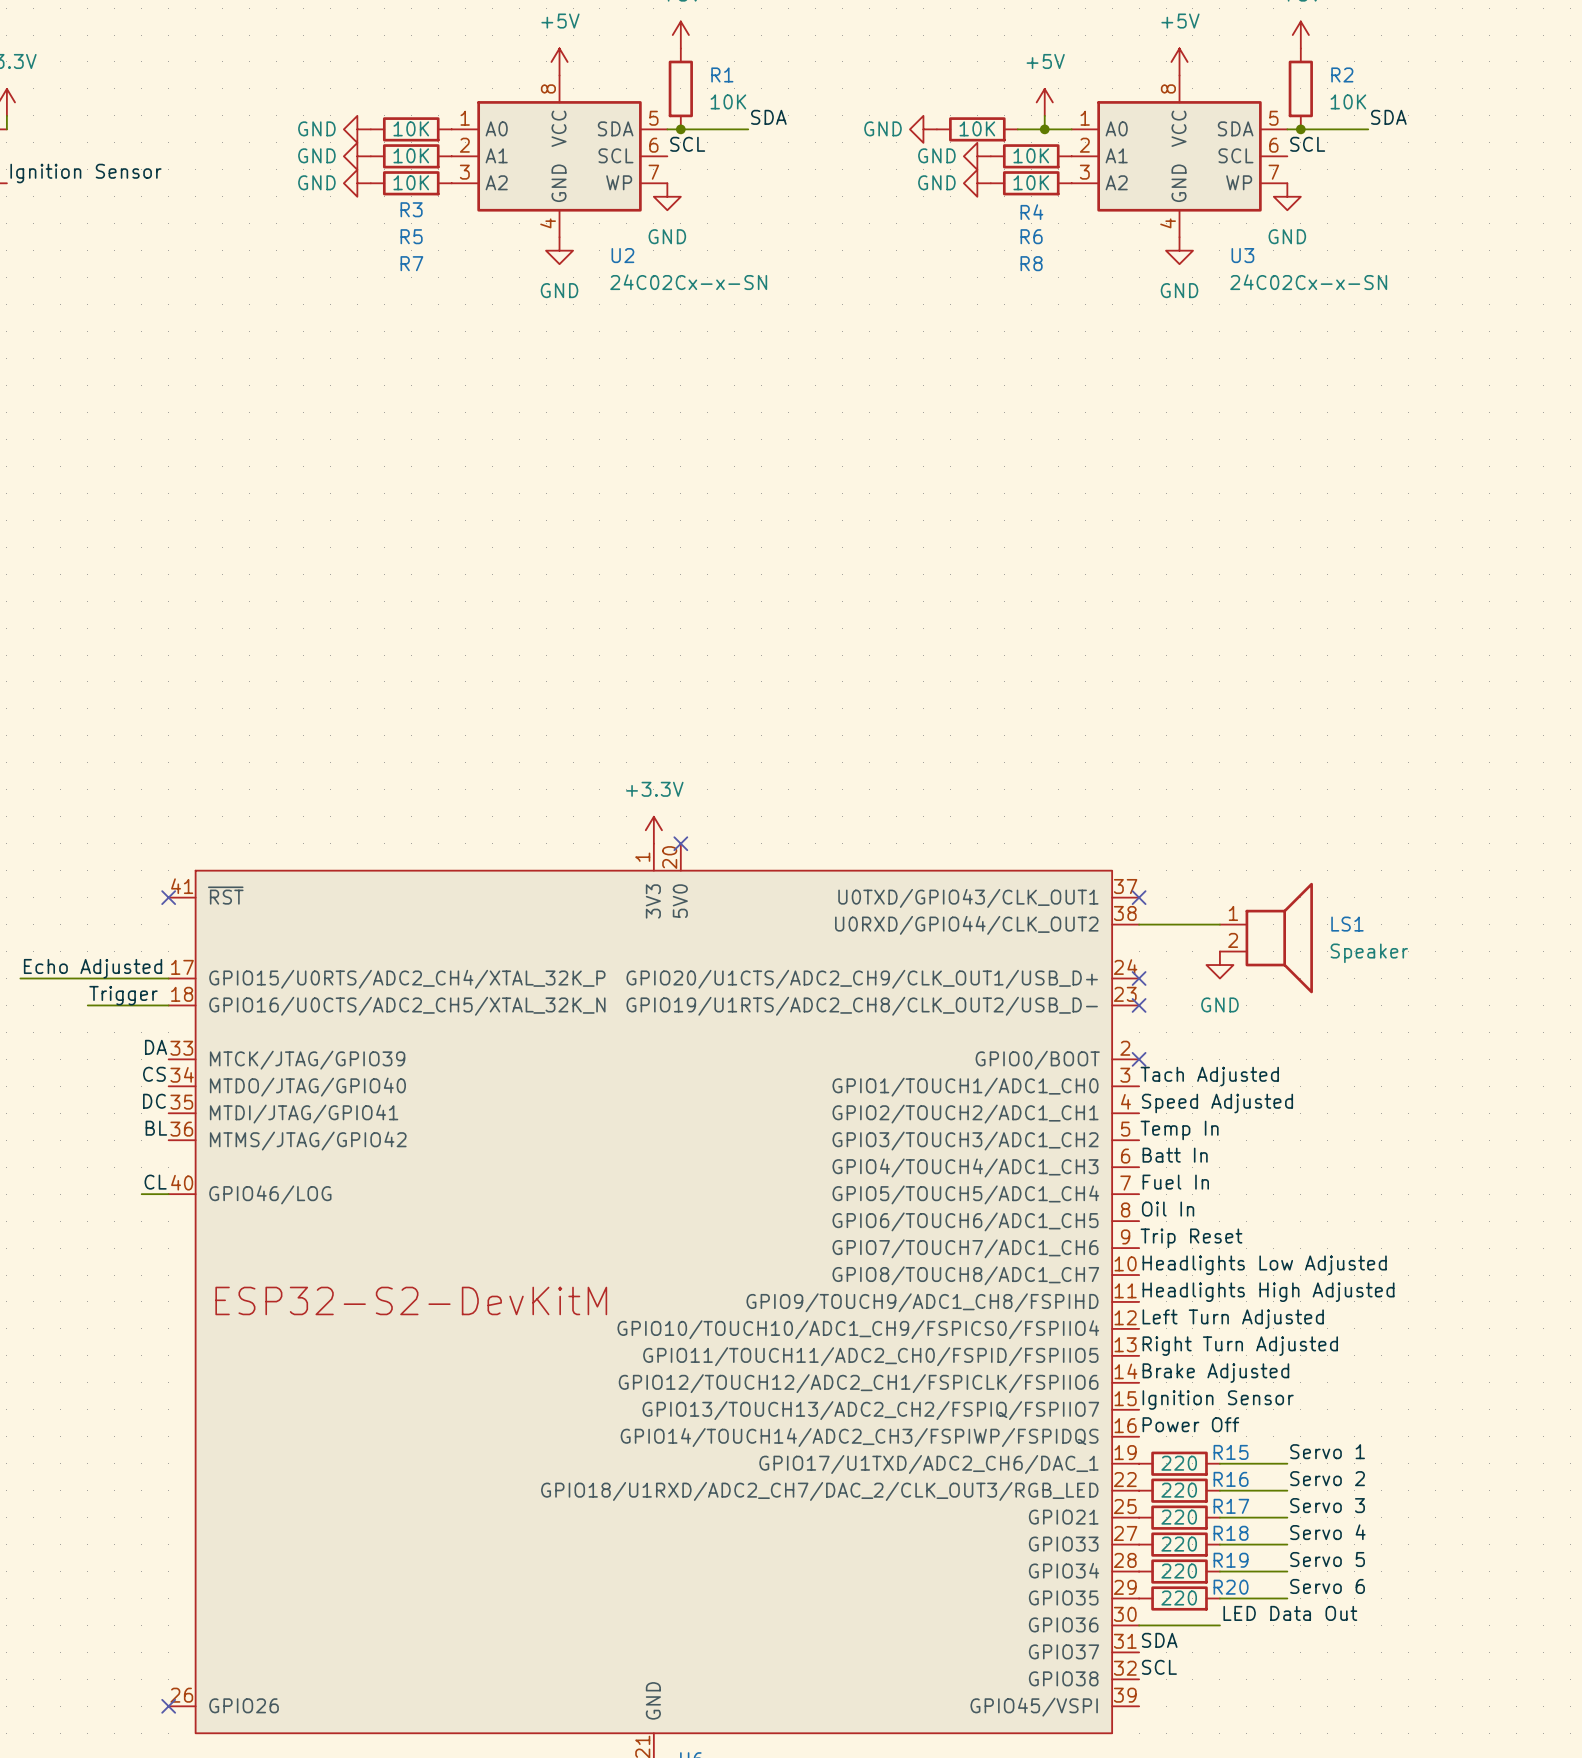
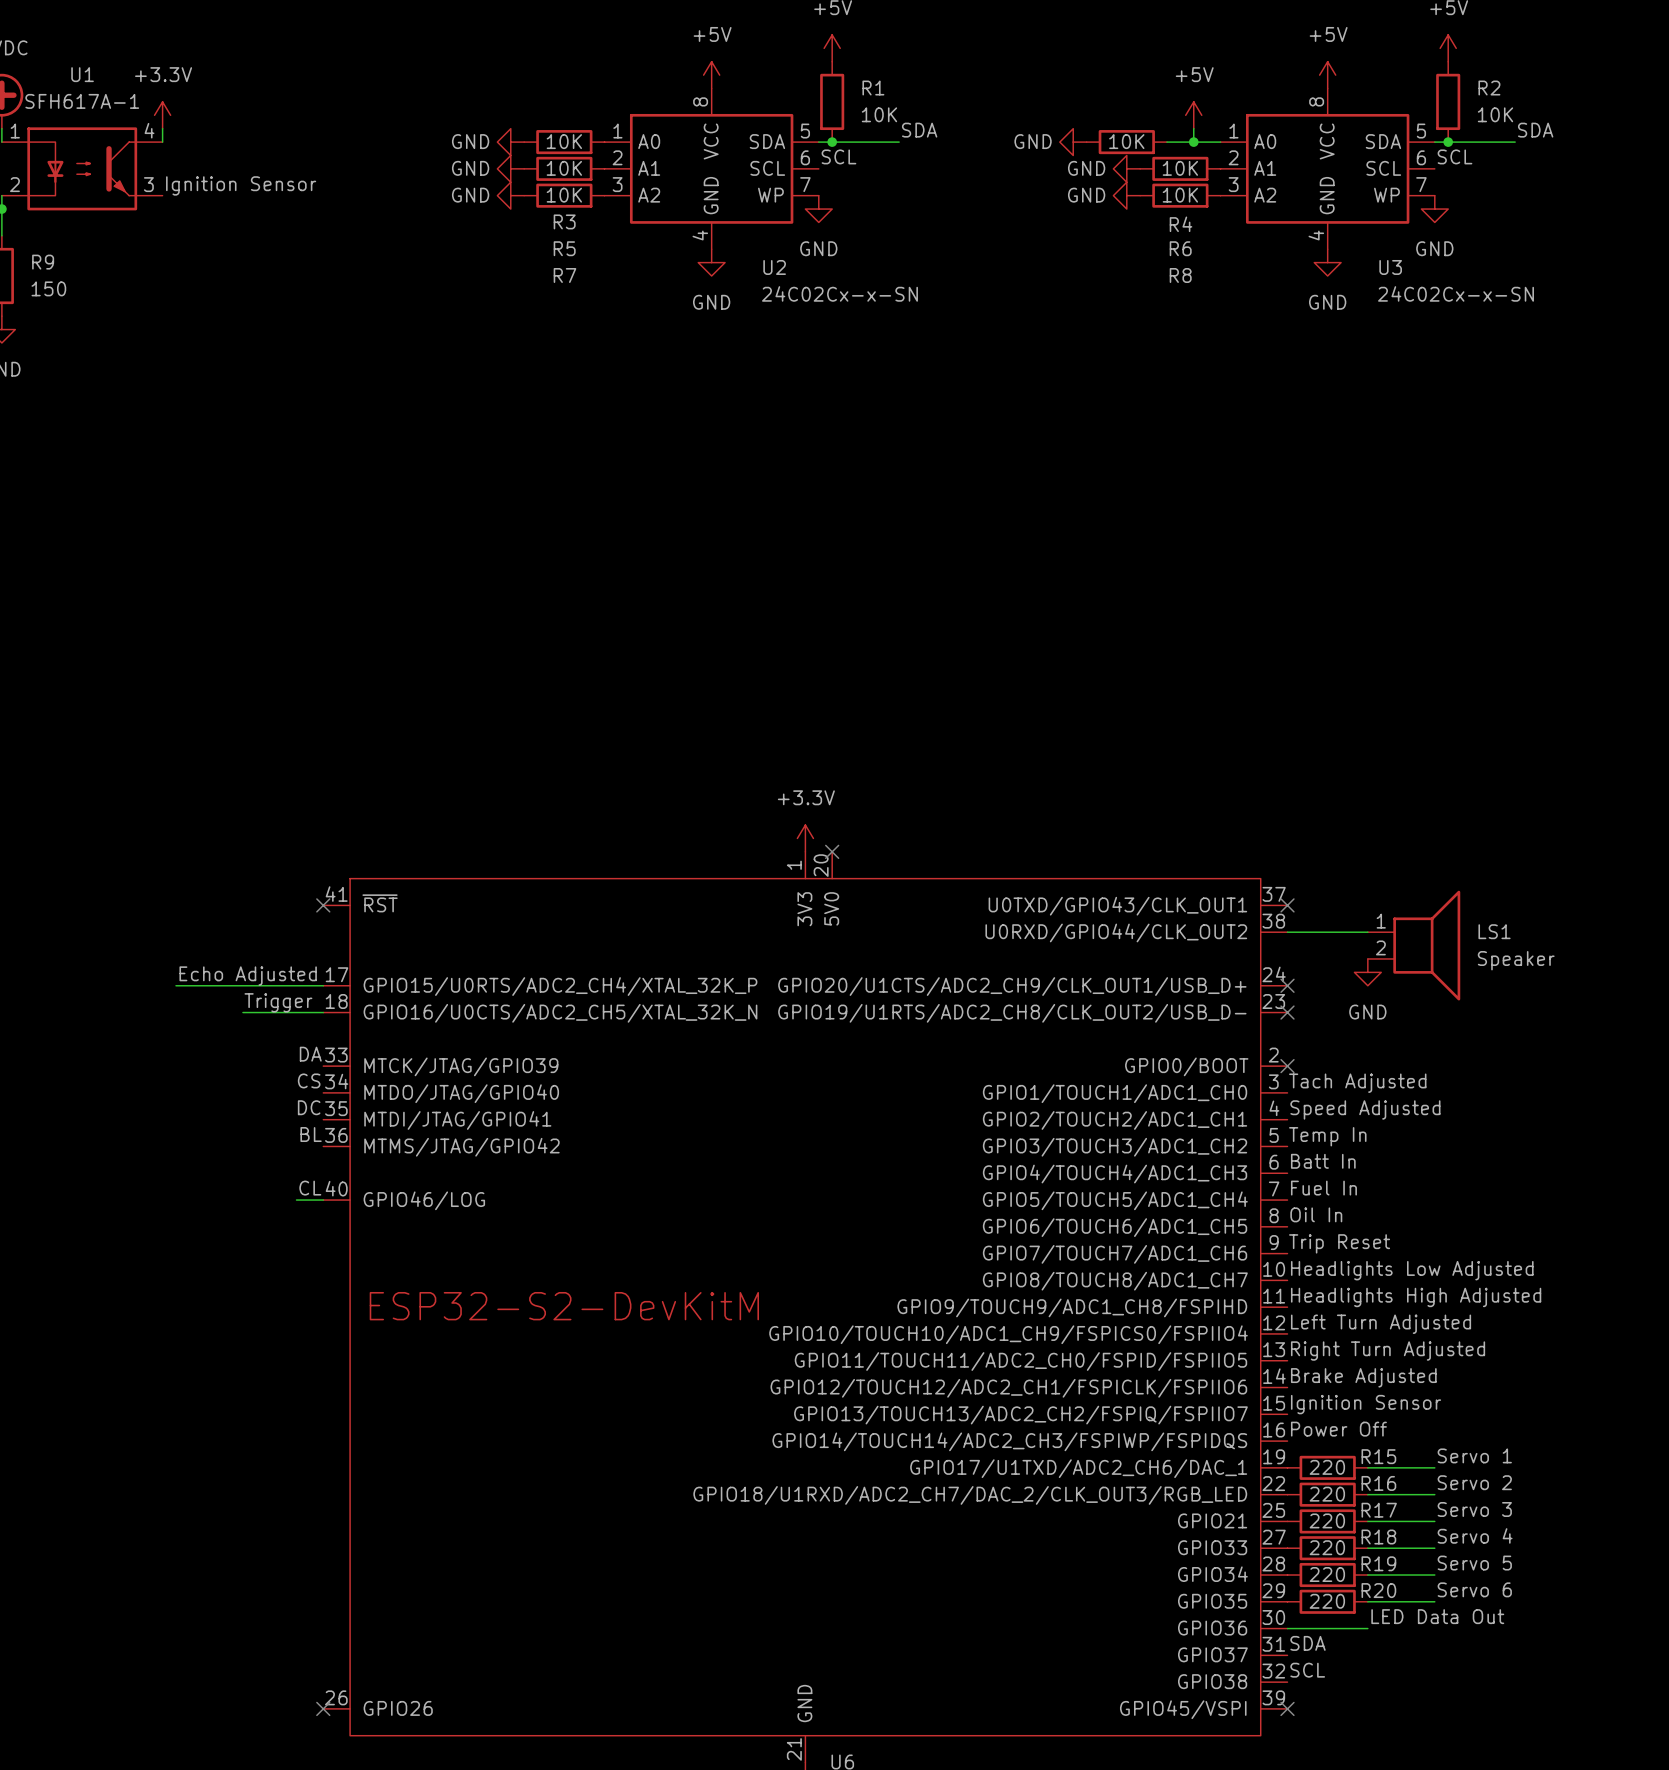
no-connect mark: none -> (1287, 1708)

